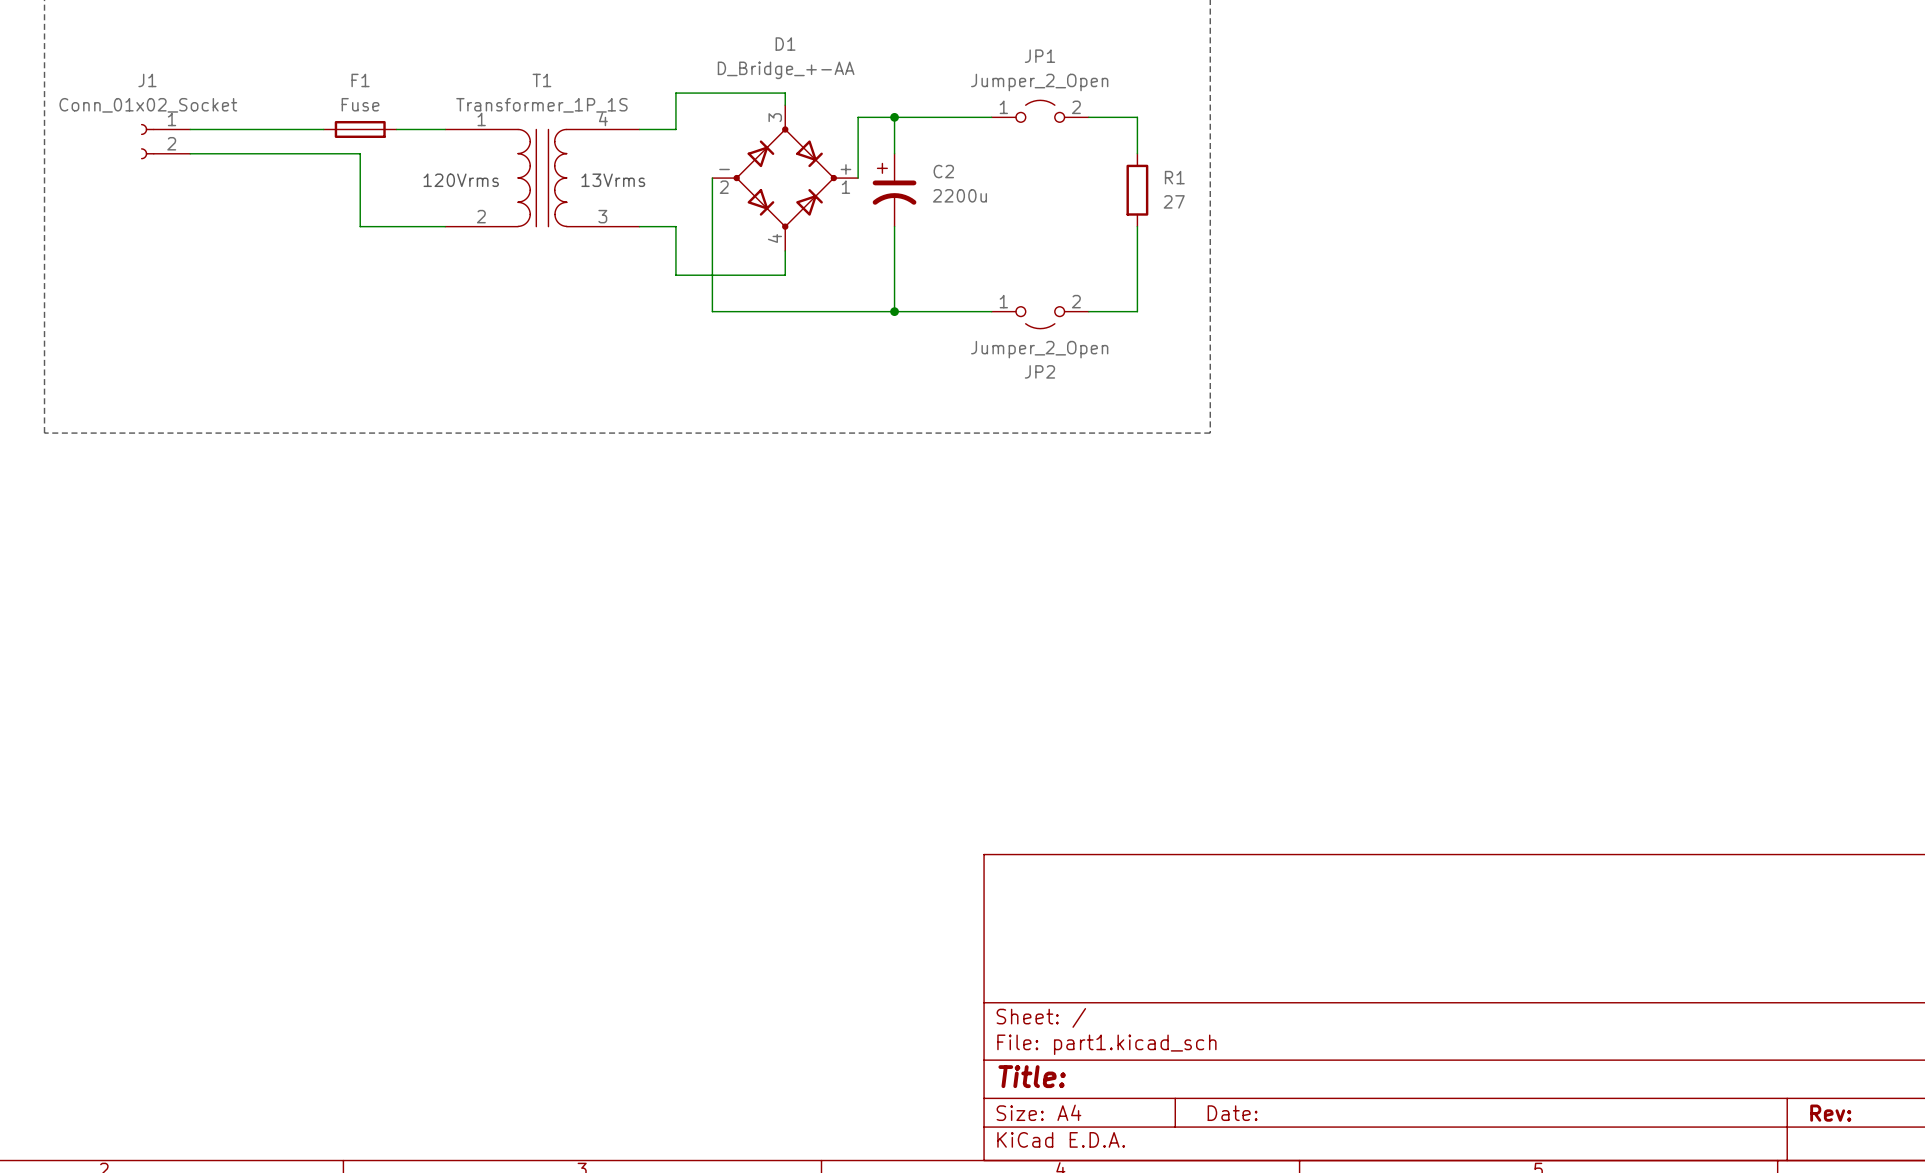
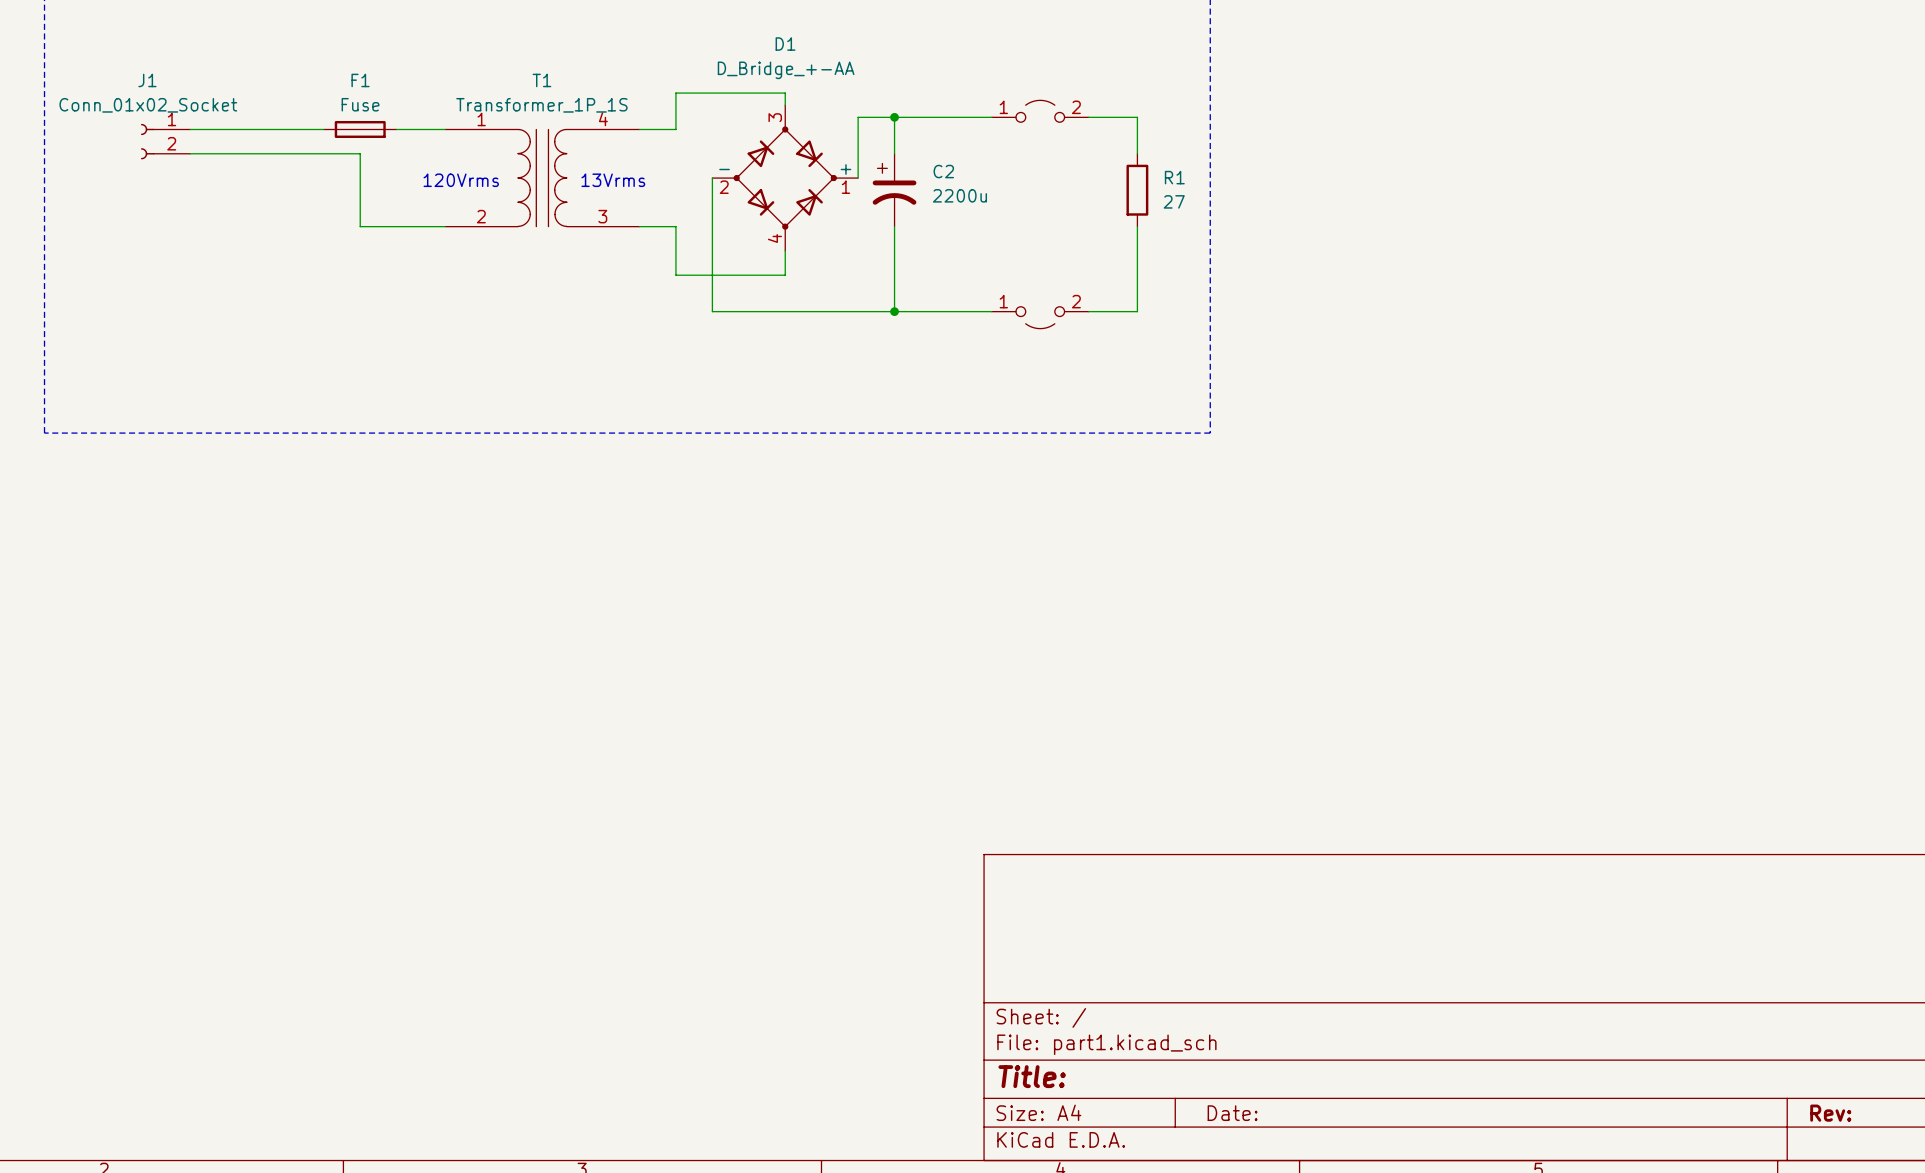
JP1 name: JP1 (1039, 56) -> none
JP1 value: Jumper_2_Open (1039, 82) -> none
JP2 value: Jumper_2_Open (1039, 349) -> none
JP2 name: JP2 (1039, 371) -> none

